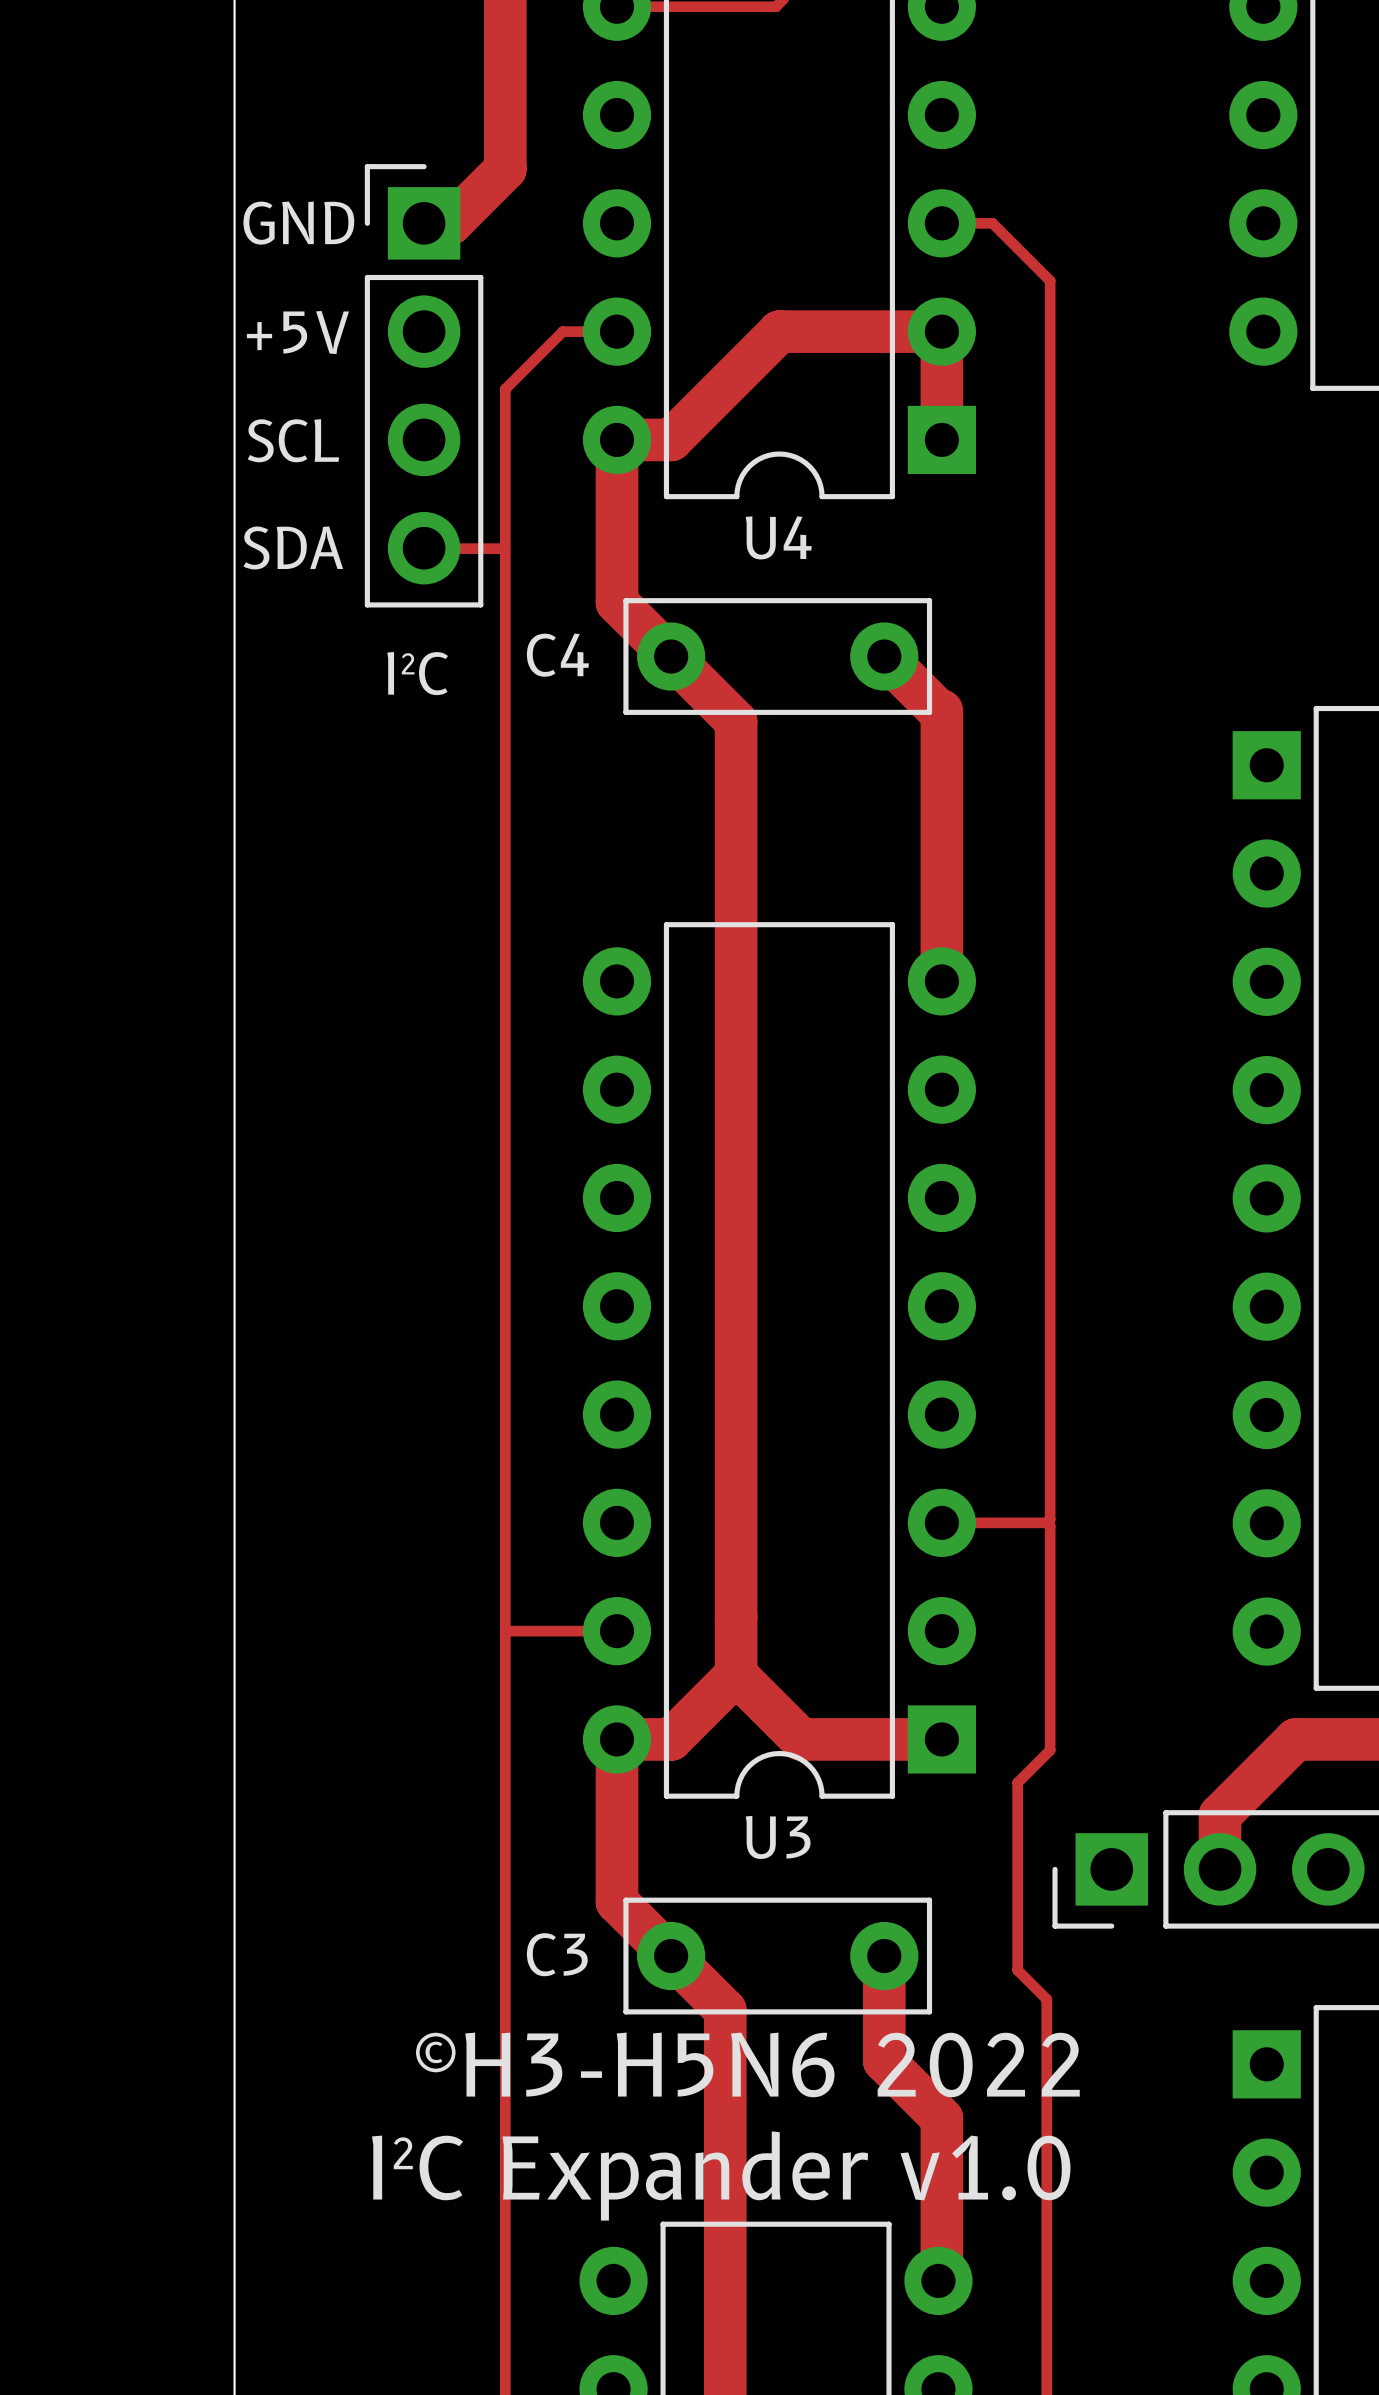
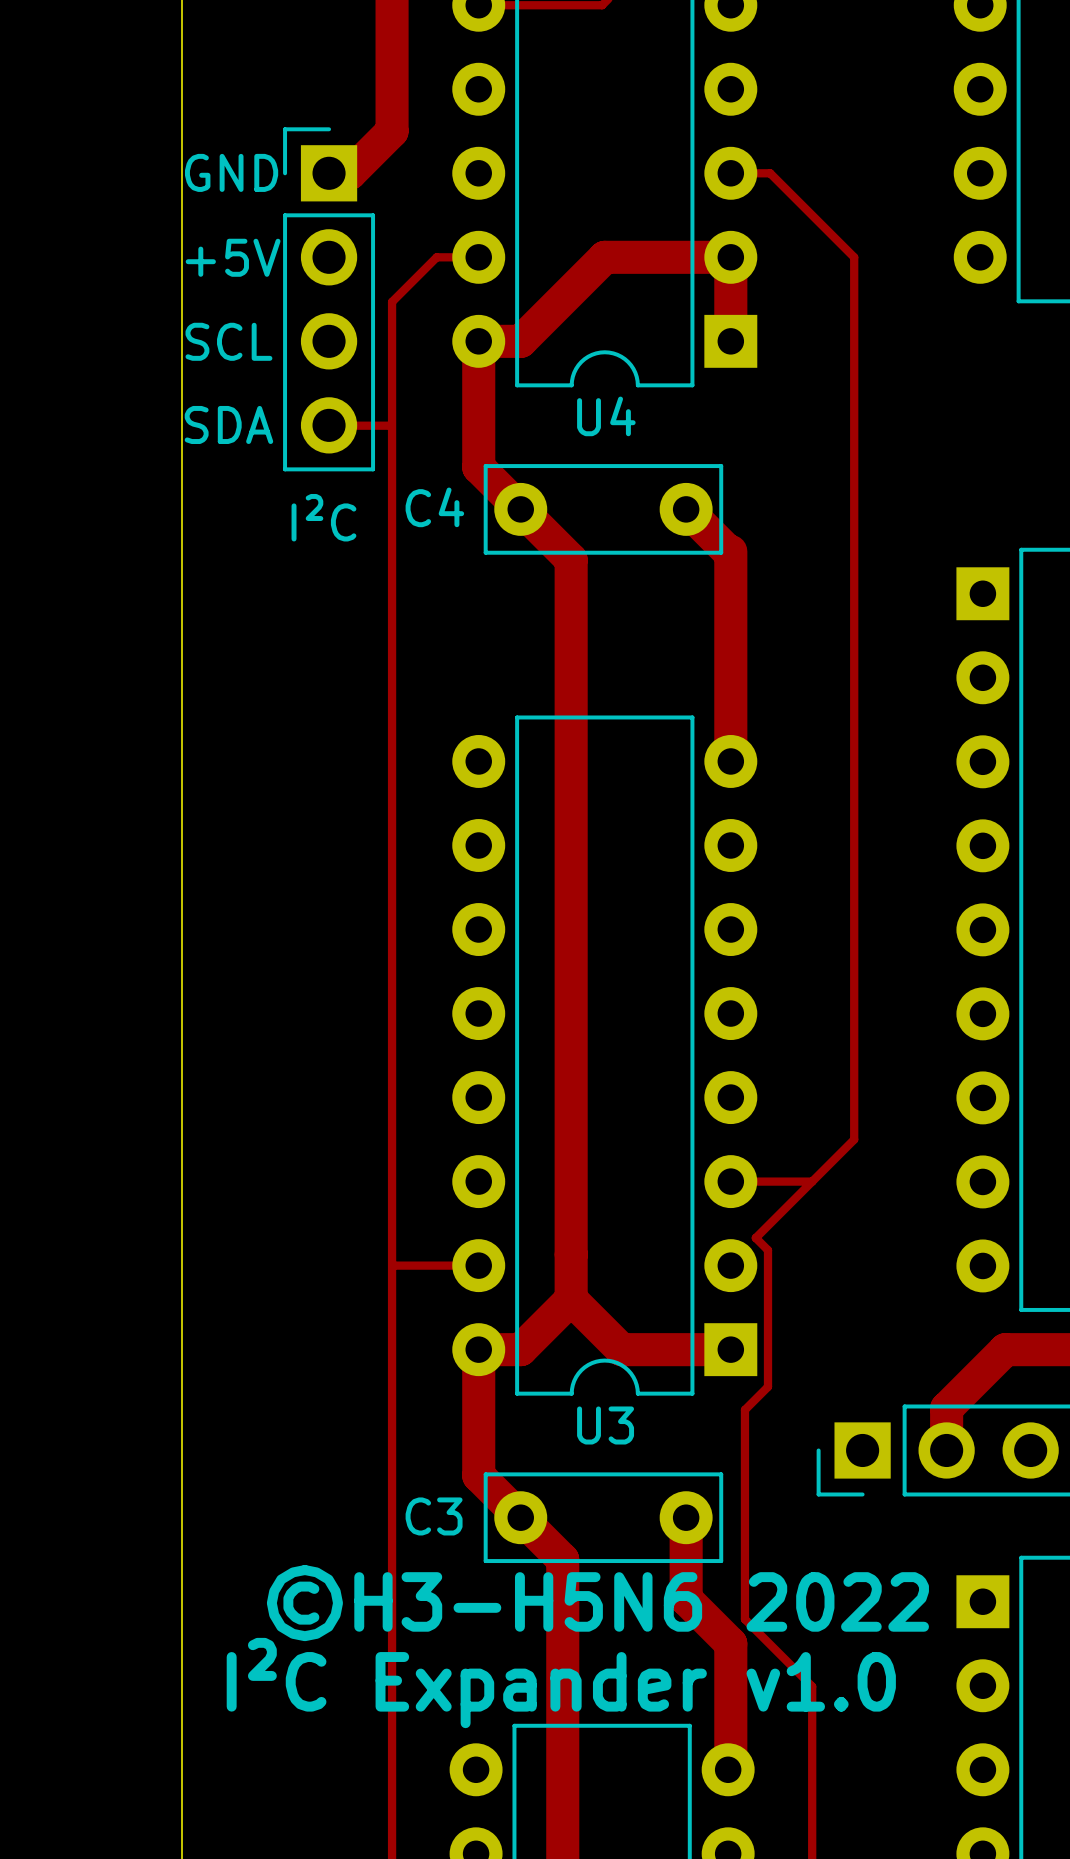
track: (1050, 280) (1050, 1519) -> (814, 217) (854, 257) (854, 1139) (814, 1178)
track: (1046, 1522) (1050, 1526) (1050, 1750) (1017, 1782) (1017, 1970) (1046, 1999) (1046, 2173) -> (812, 1181) (755, 1238) (768, 1250) (768, 1386) (744, 1409) (744, 1619) (812, 1686)

